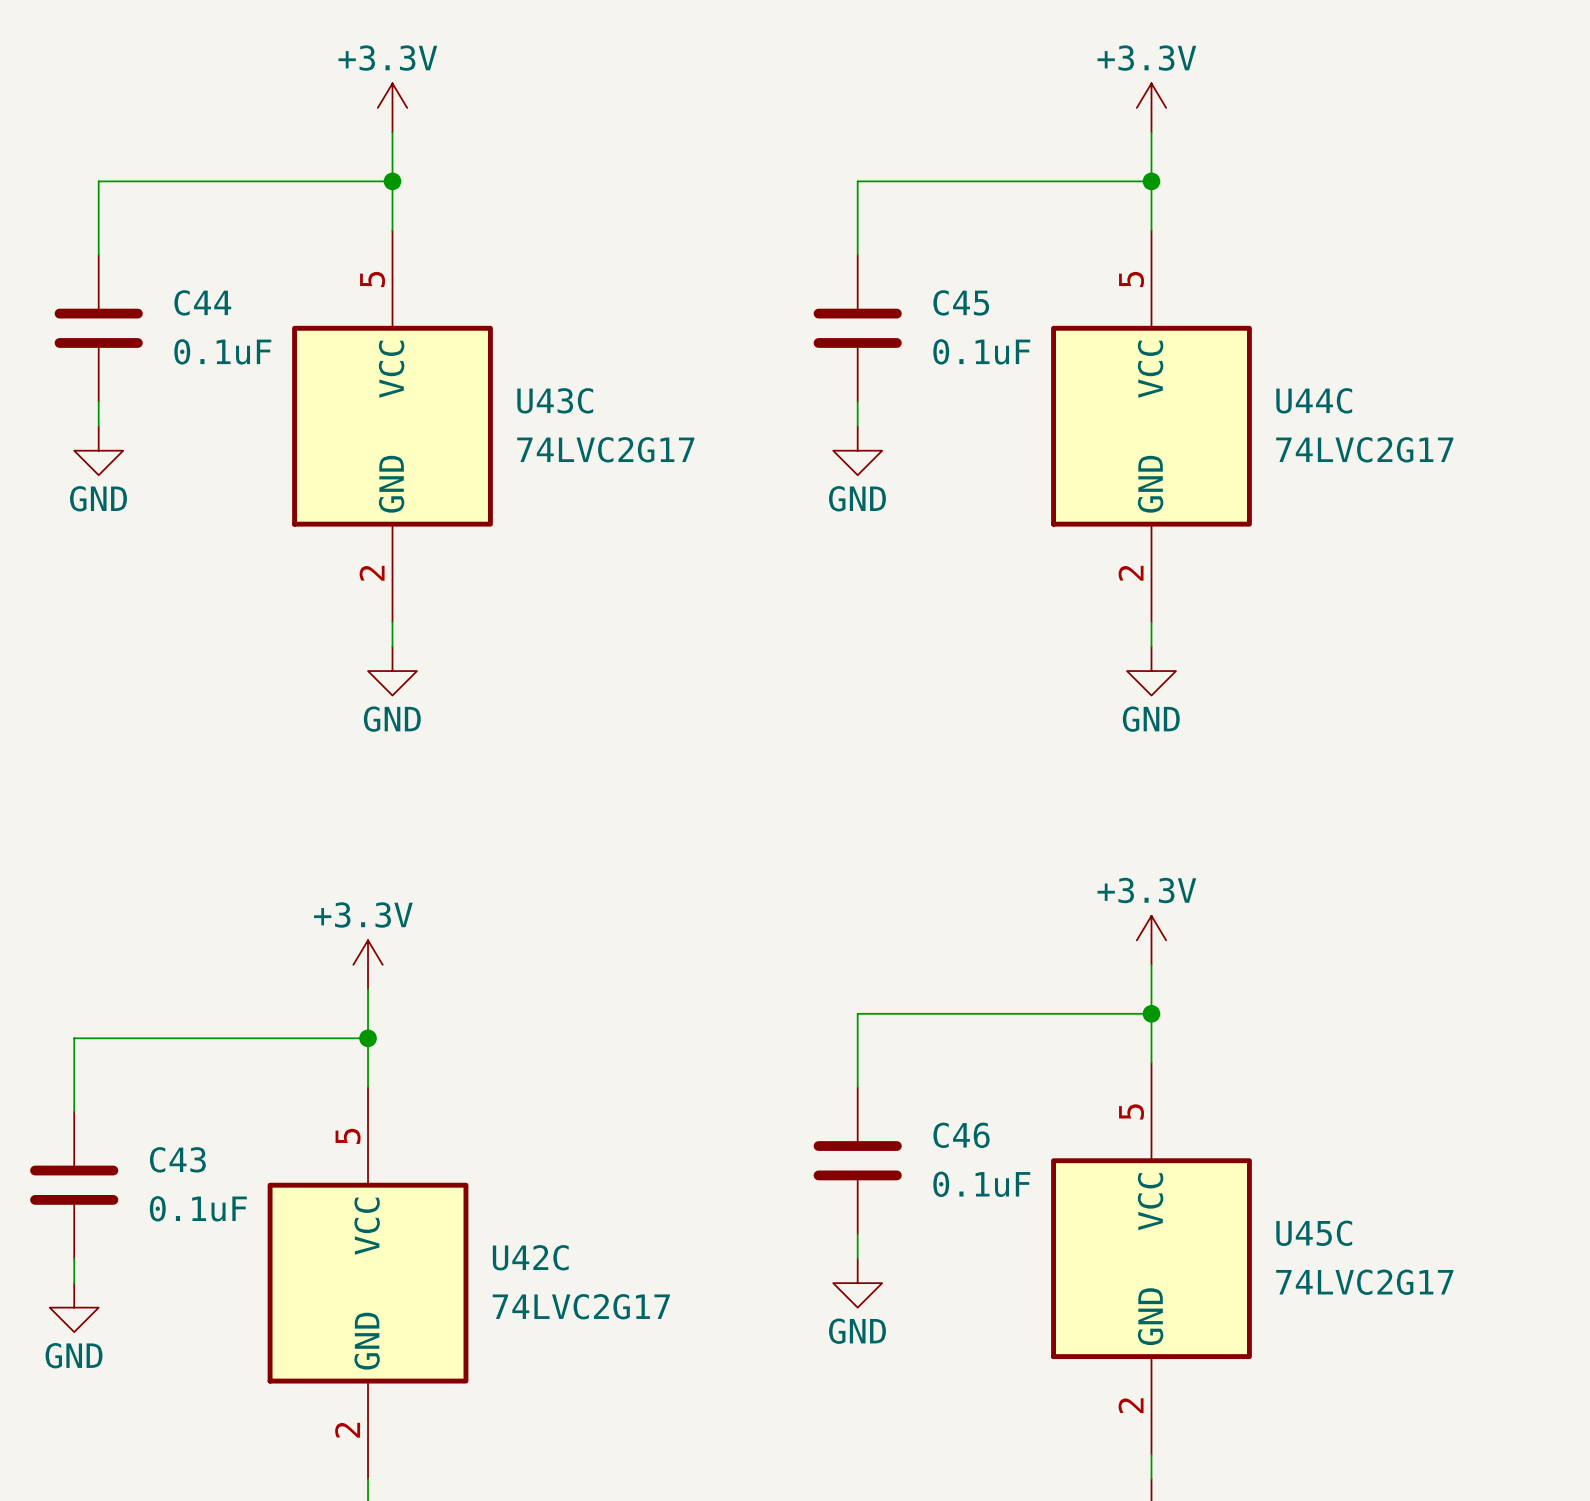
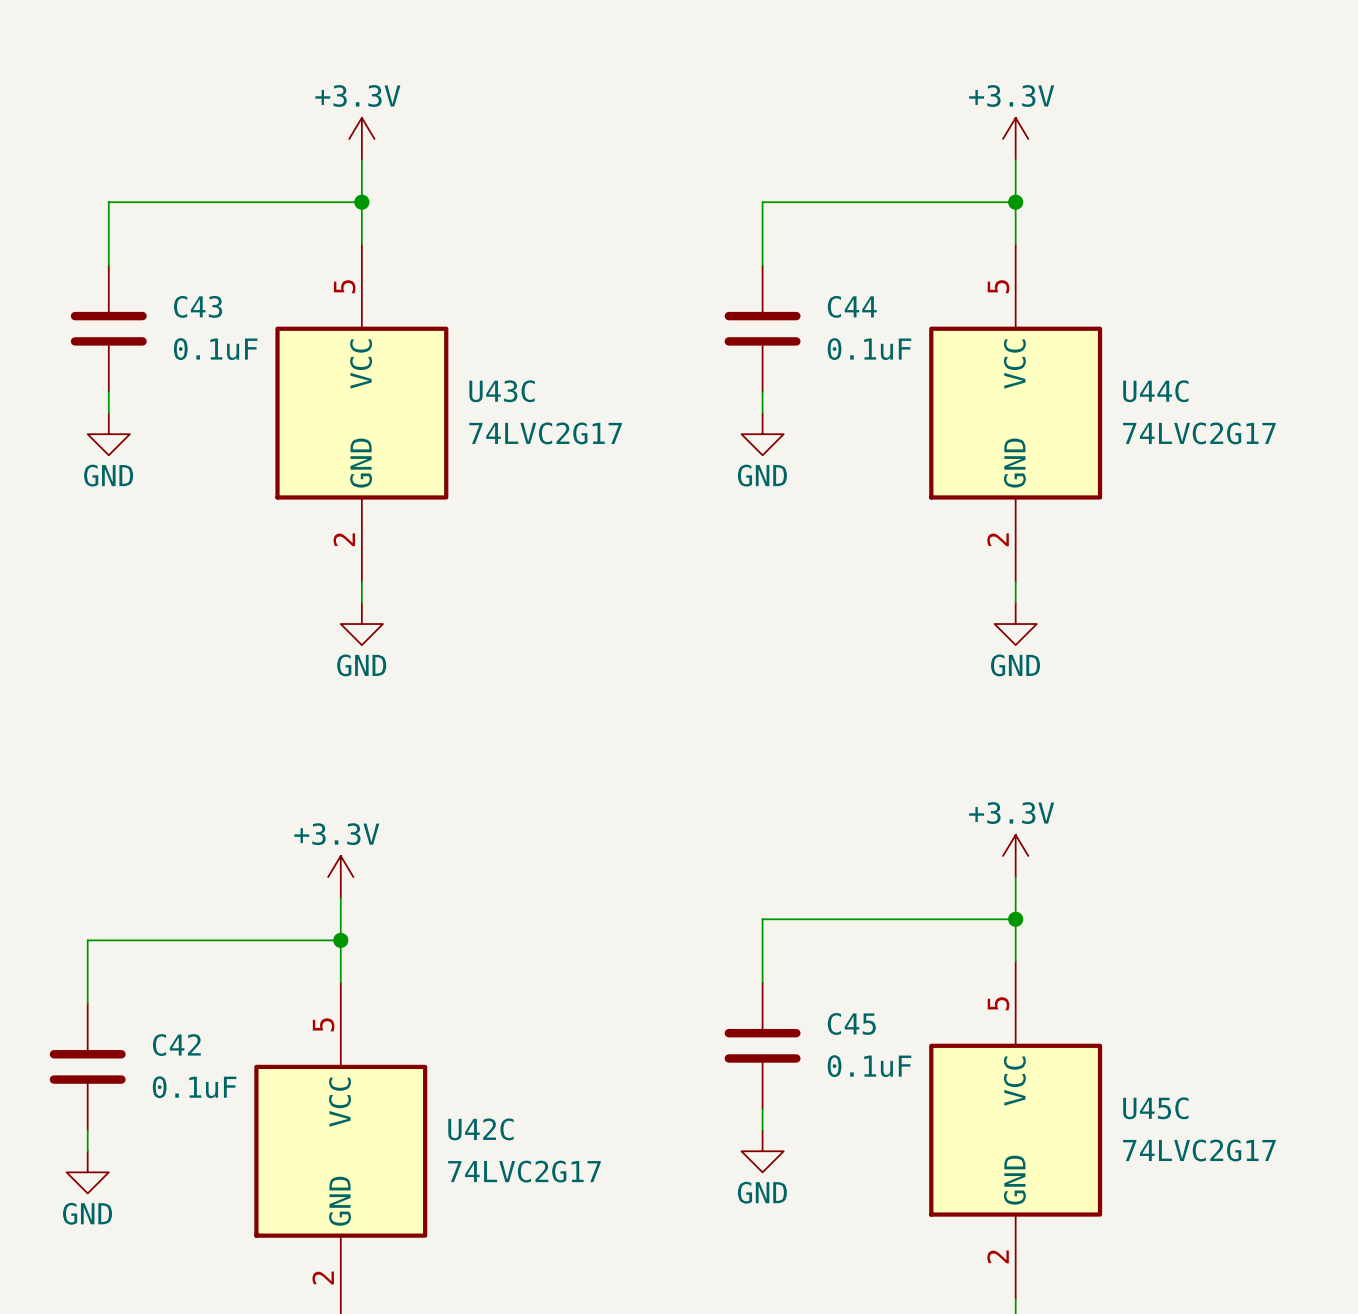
C44 name: C44 (202, 302) -> C43 (198, 306)
C45 name: C45 (961, 302) -> C44 (852, 306)
C46 name: C46 (961, 1135) -> C45 (851, 1023)
C43 name: C43 (177, 1159) -> C42 (176, 1045)

